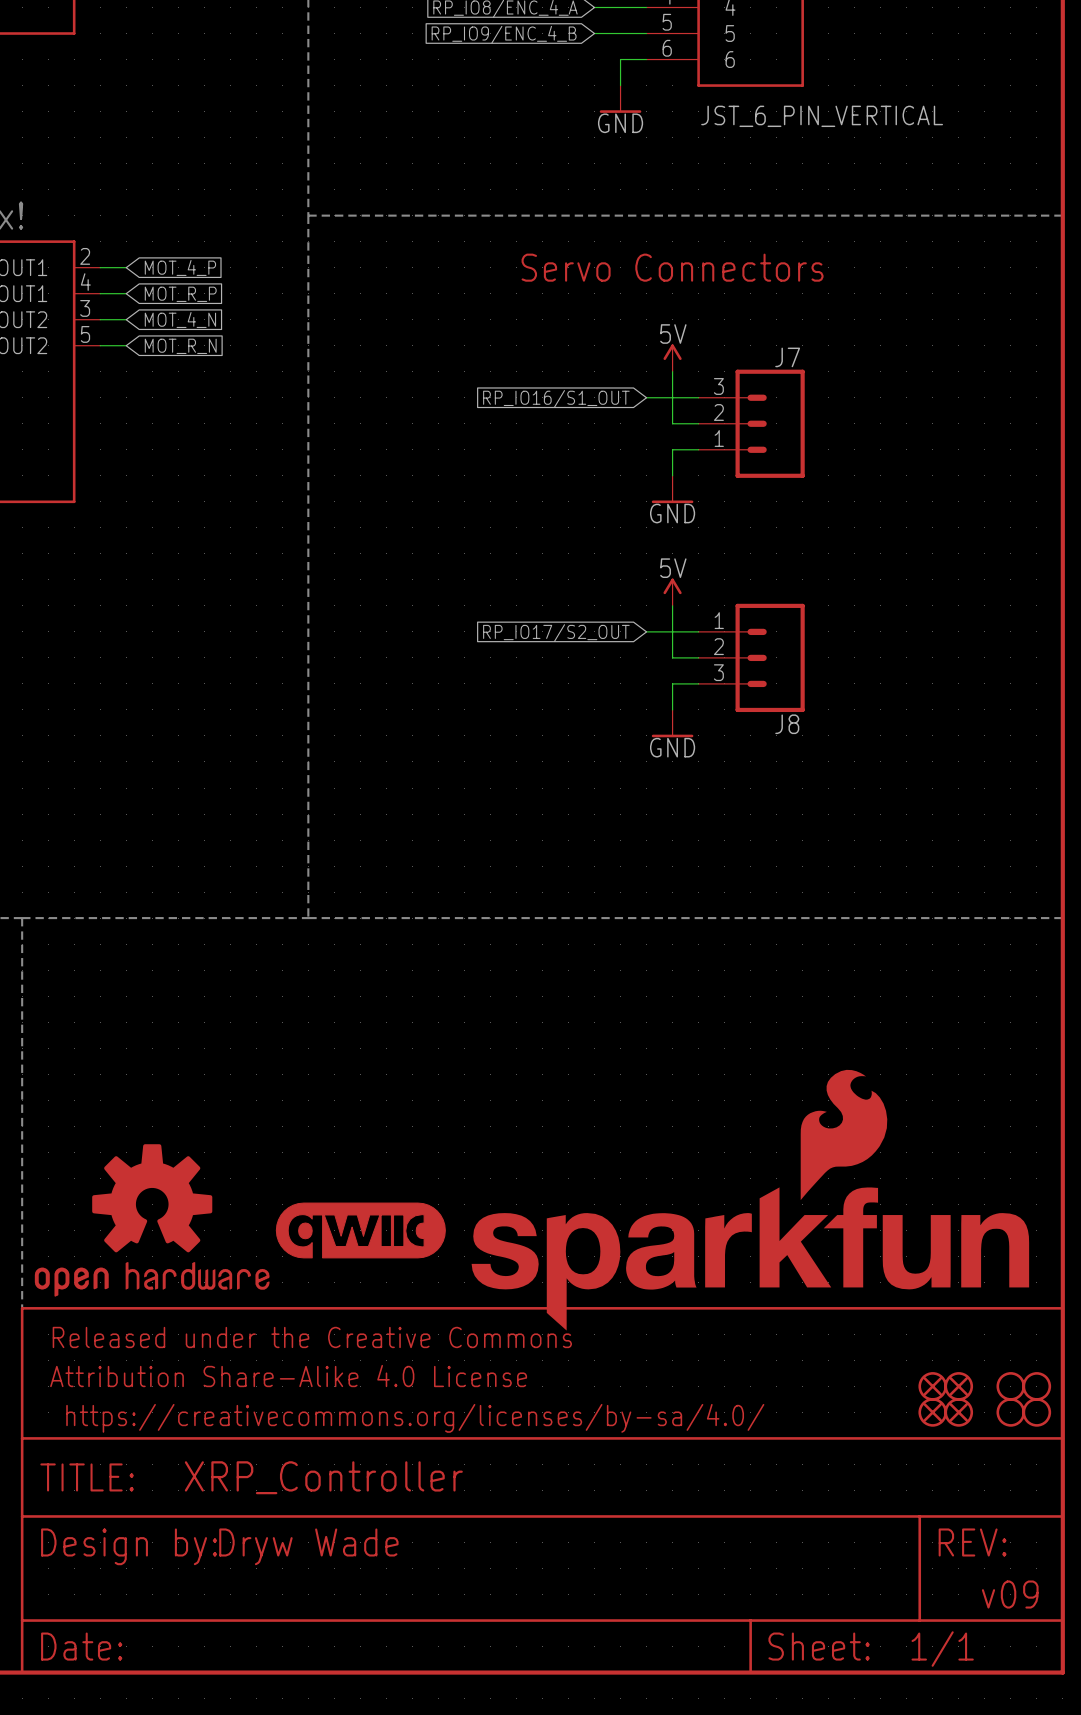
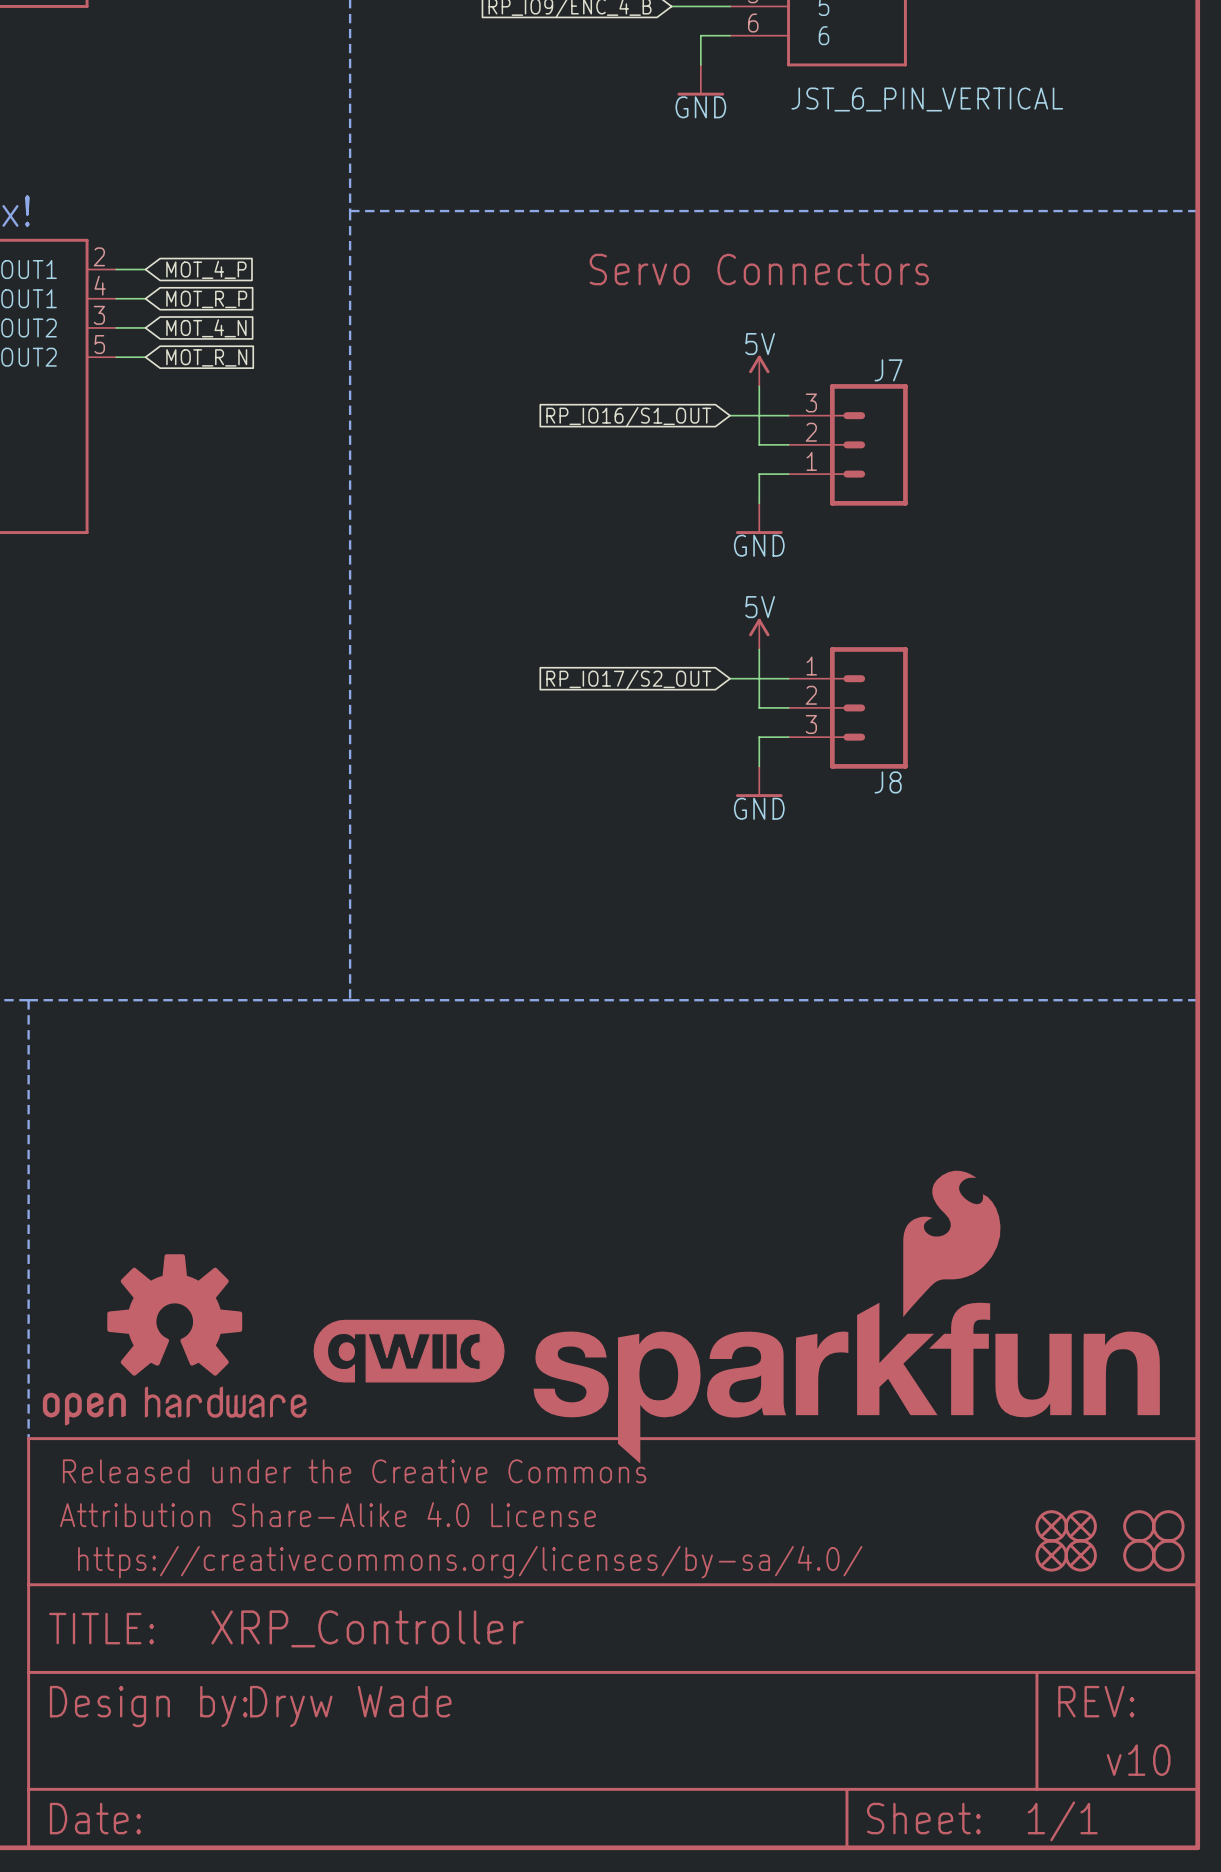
text: v09 (1010, 1594) -> v10 (1138, 1760)

